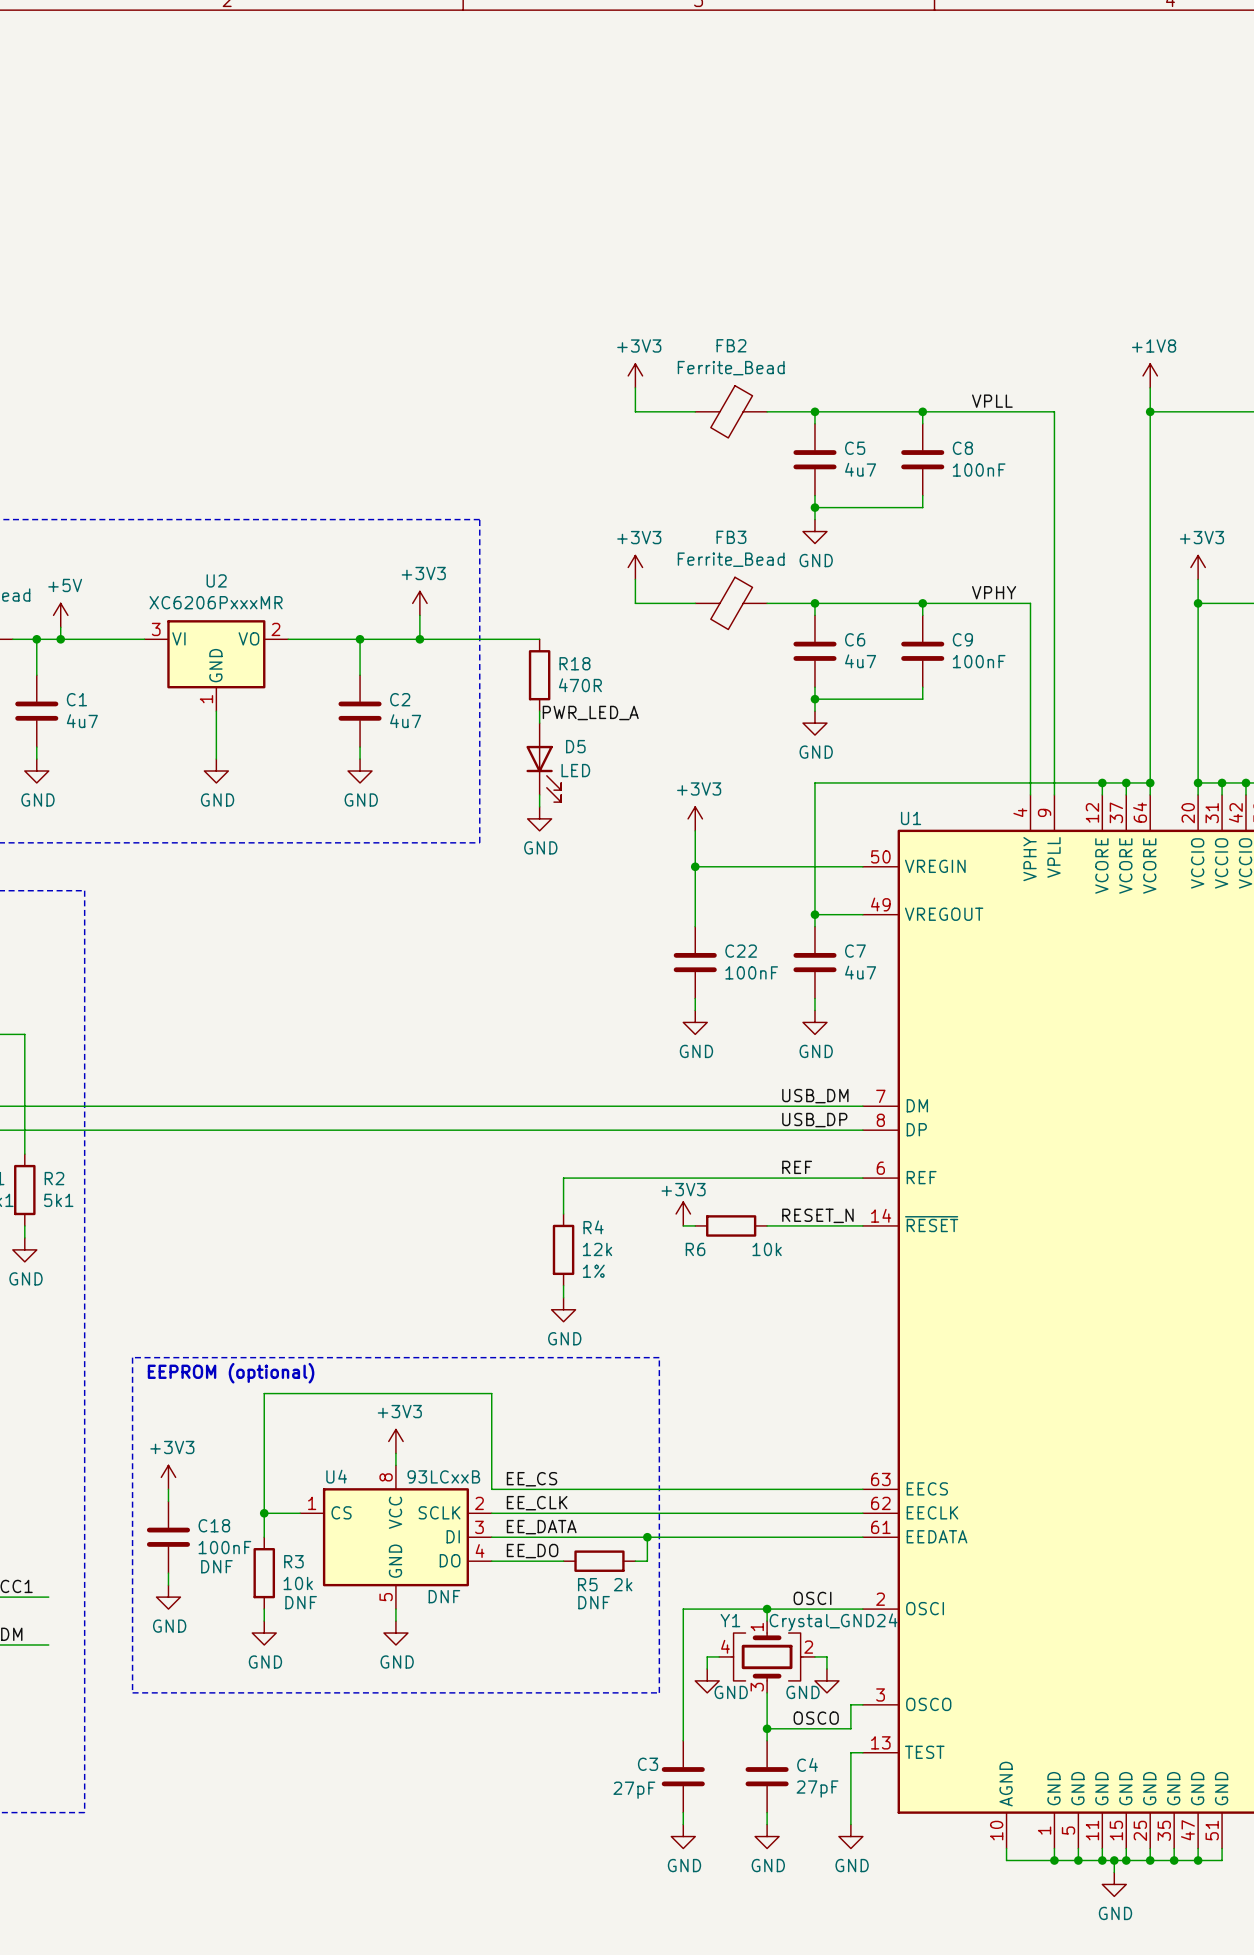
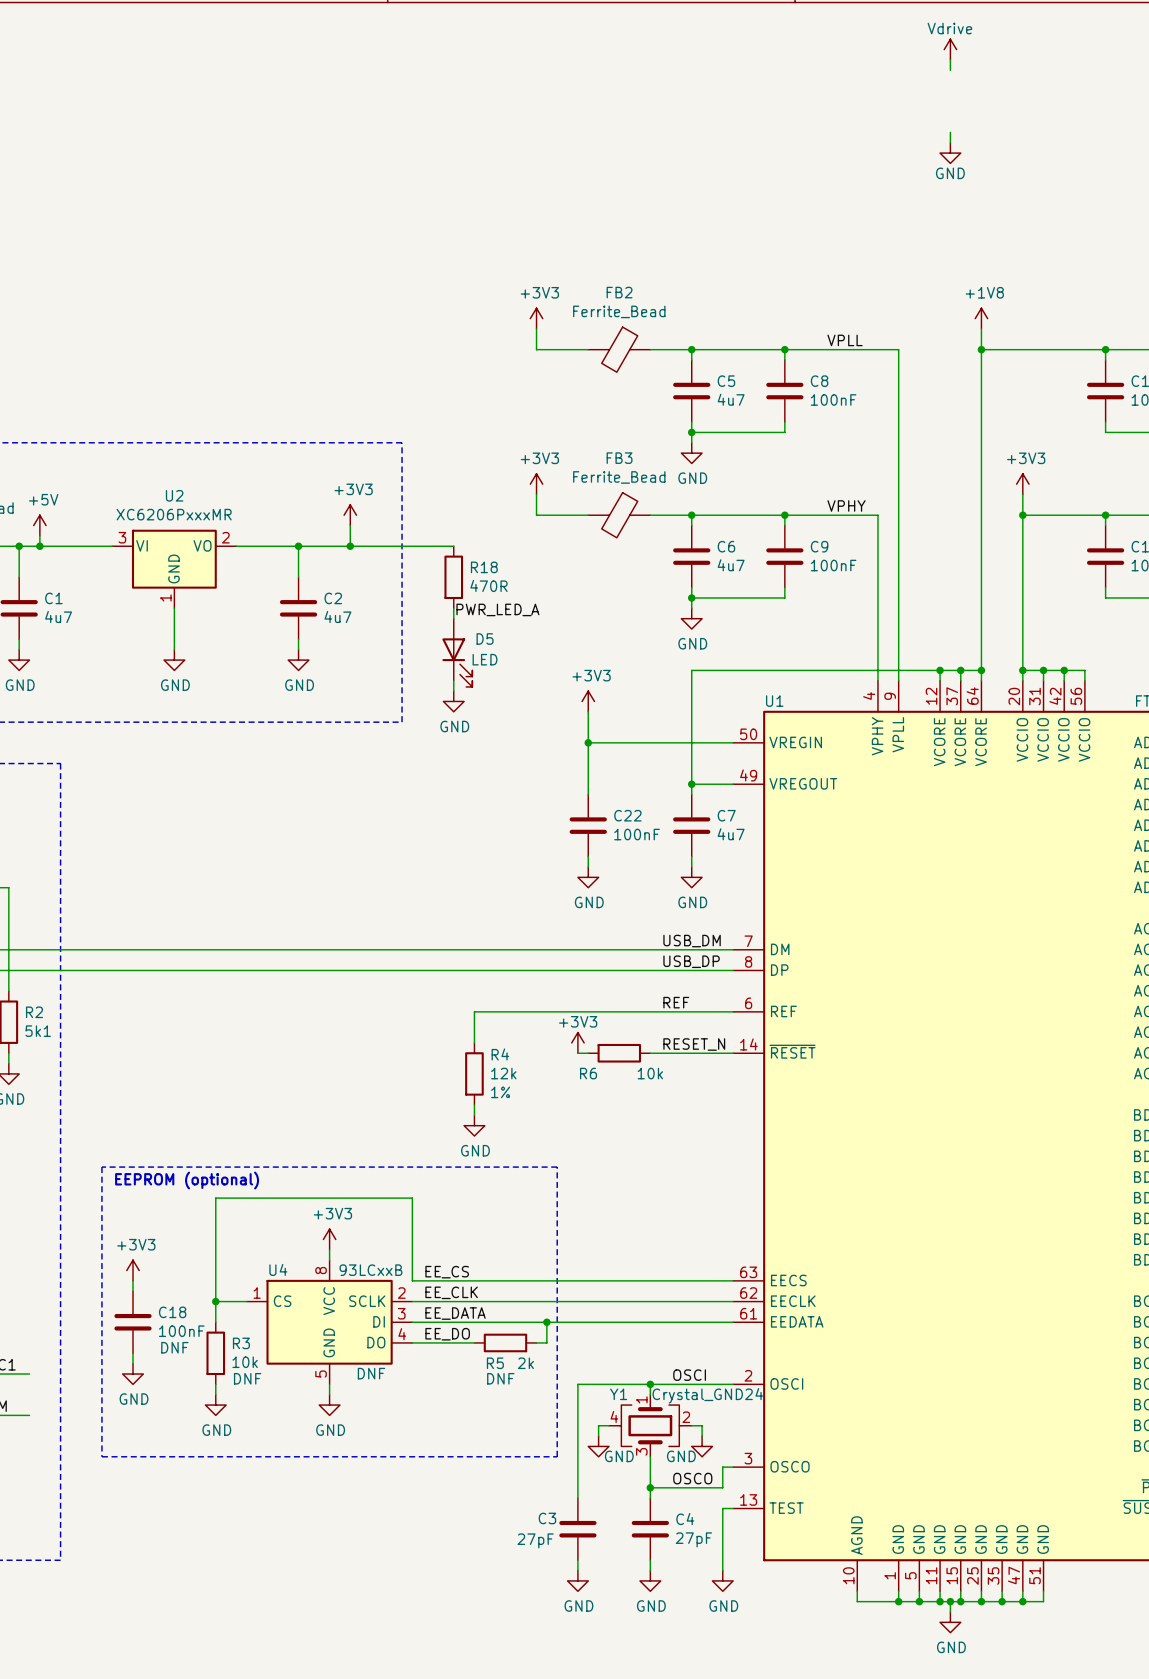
power symbol: none -> Vdrive (950, 49)
wire: none -> (950, 59) (950, 70)
wire: none -> (950, 132) (950, 142)
power symbol: none -> GND (950, 153)

